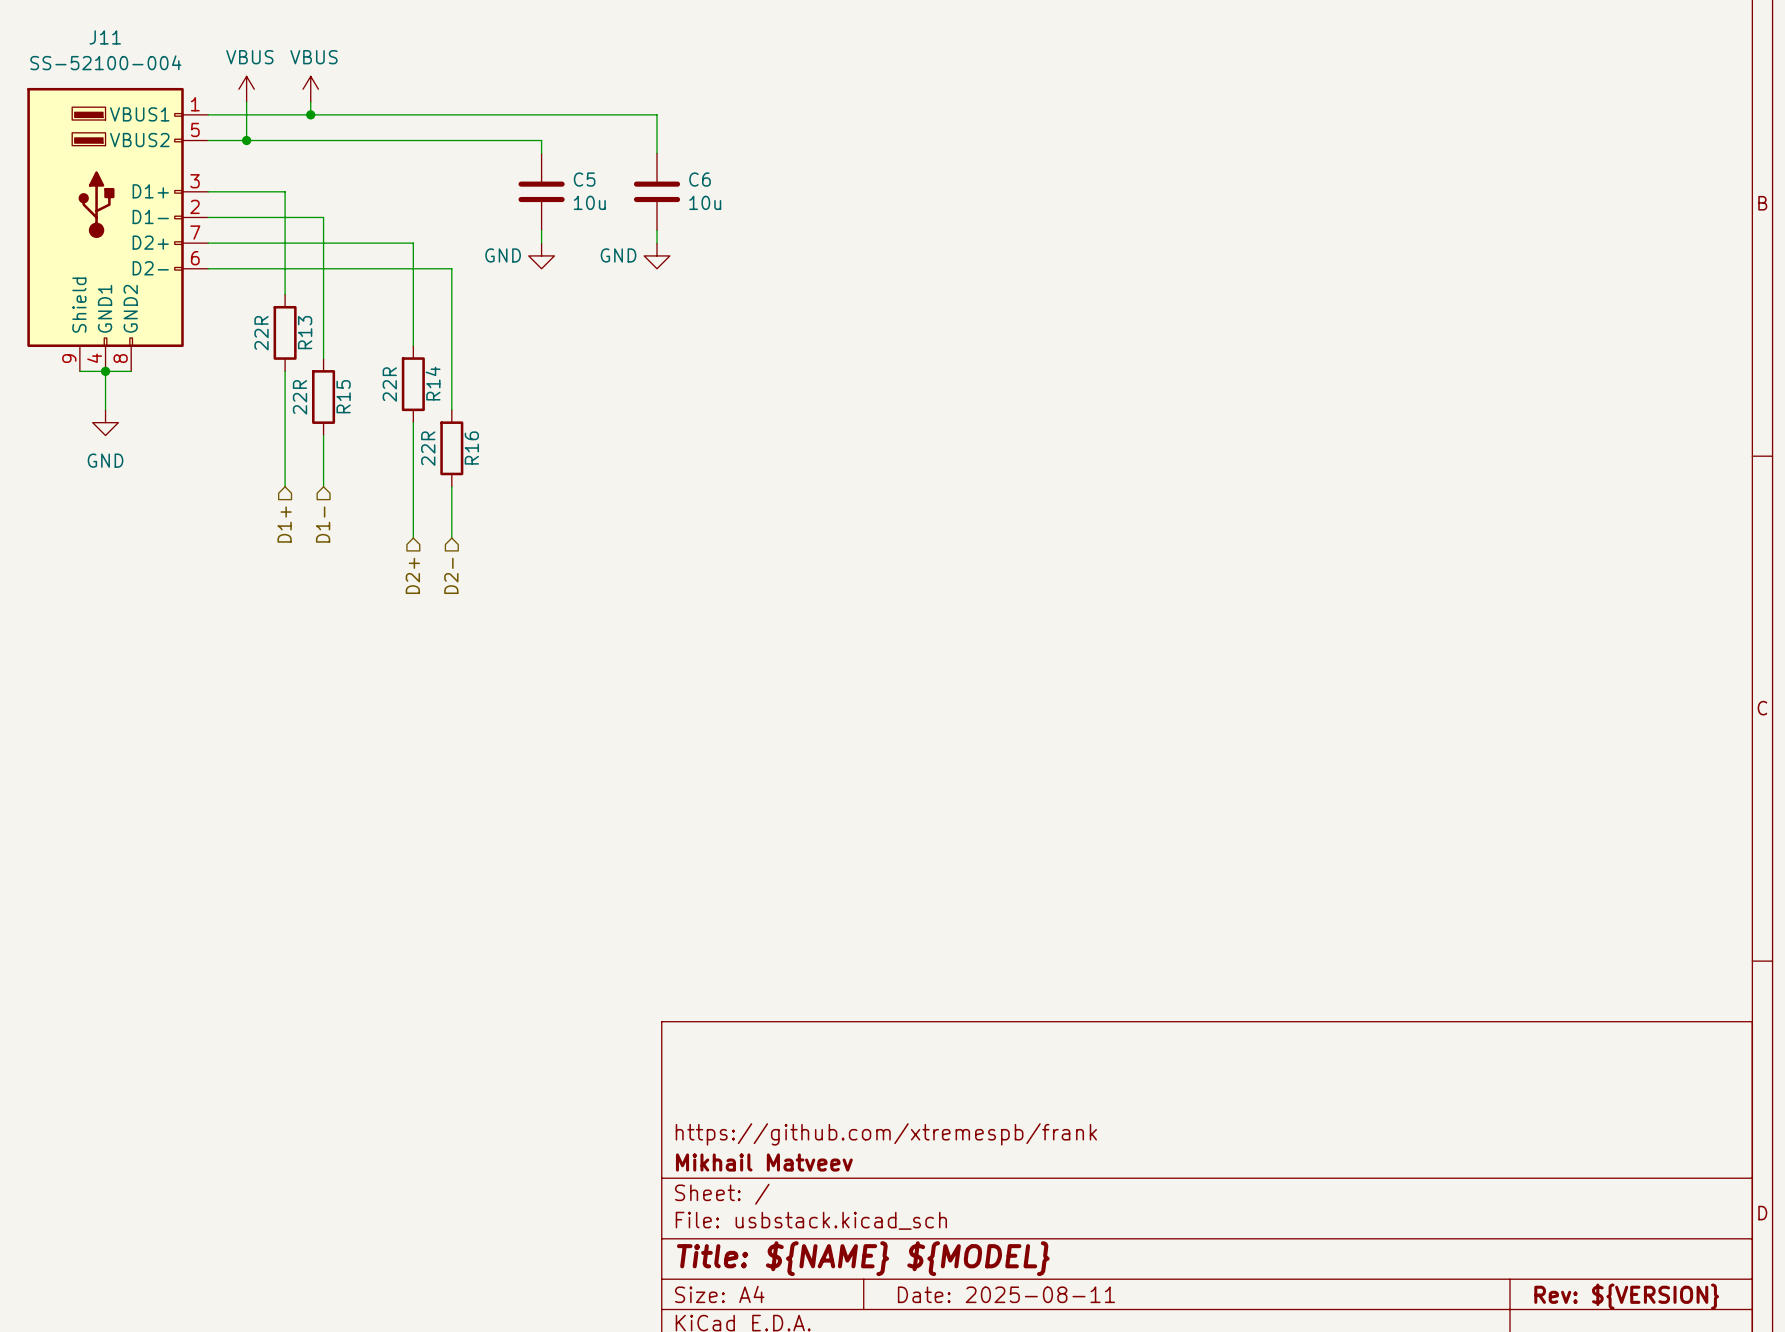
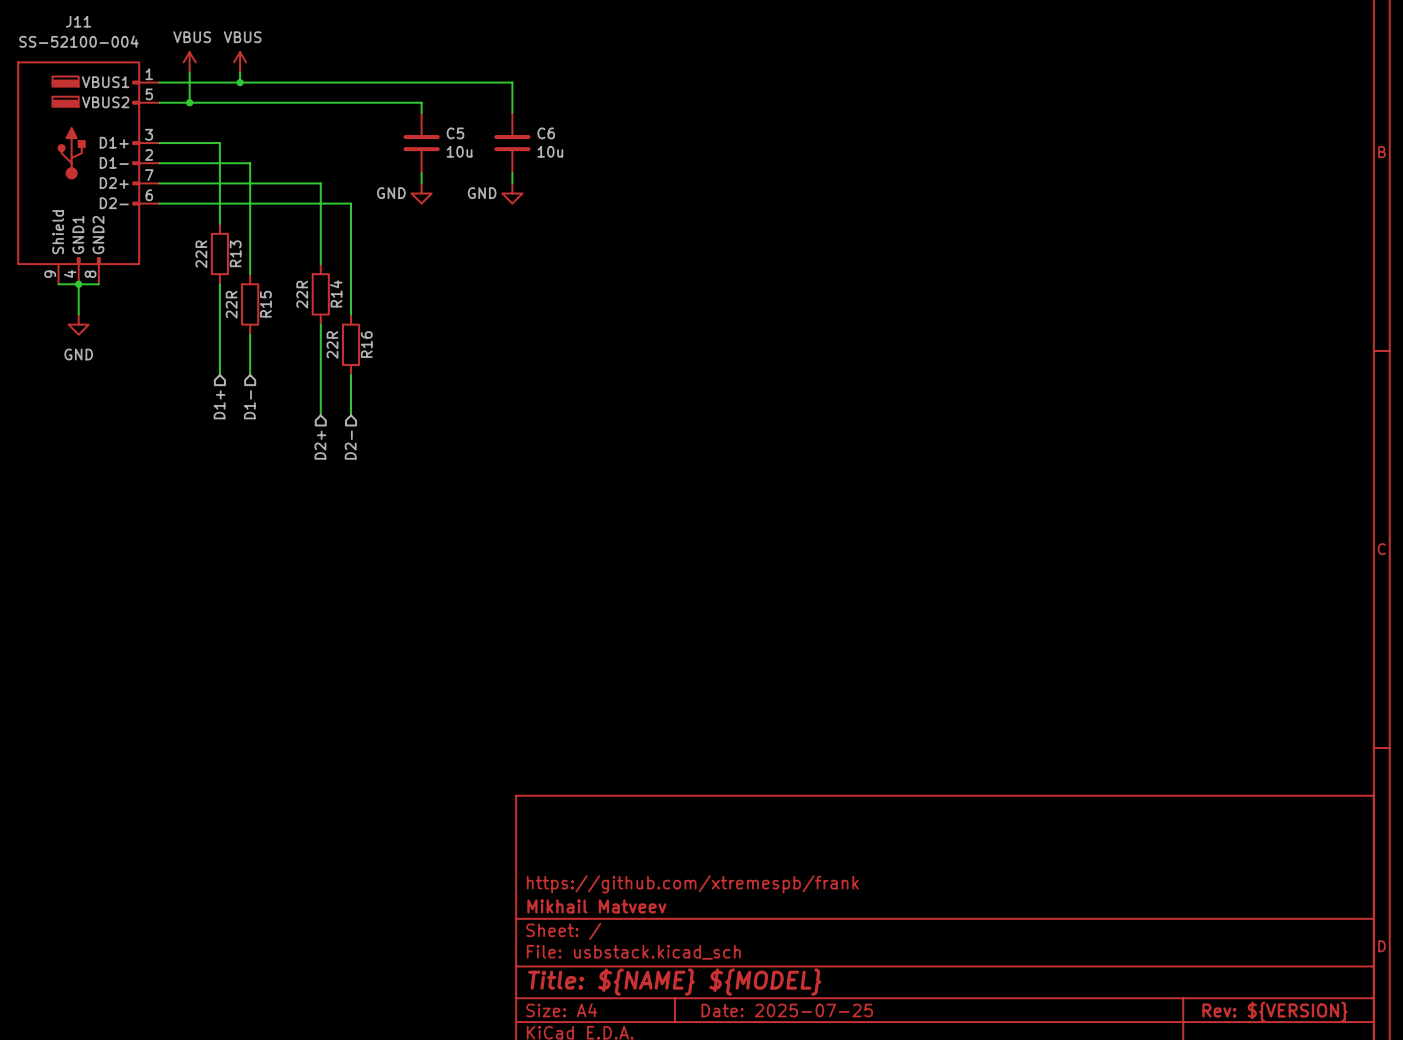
title block: Date: 2025-08-11 (1006, 1294) -> Date: 2025-07-25 (787, 1010)

